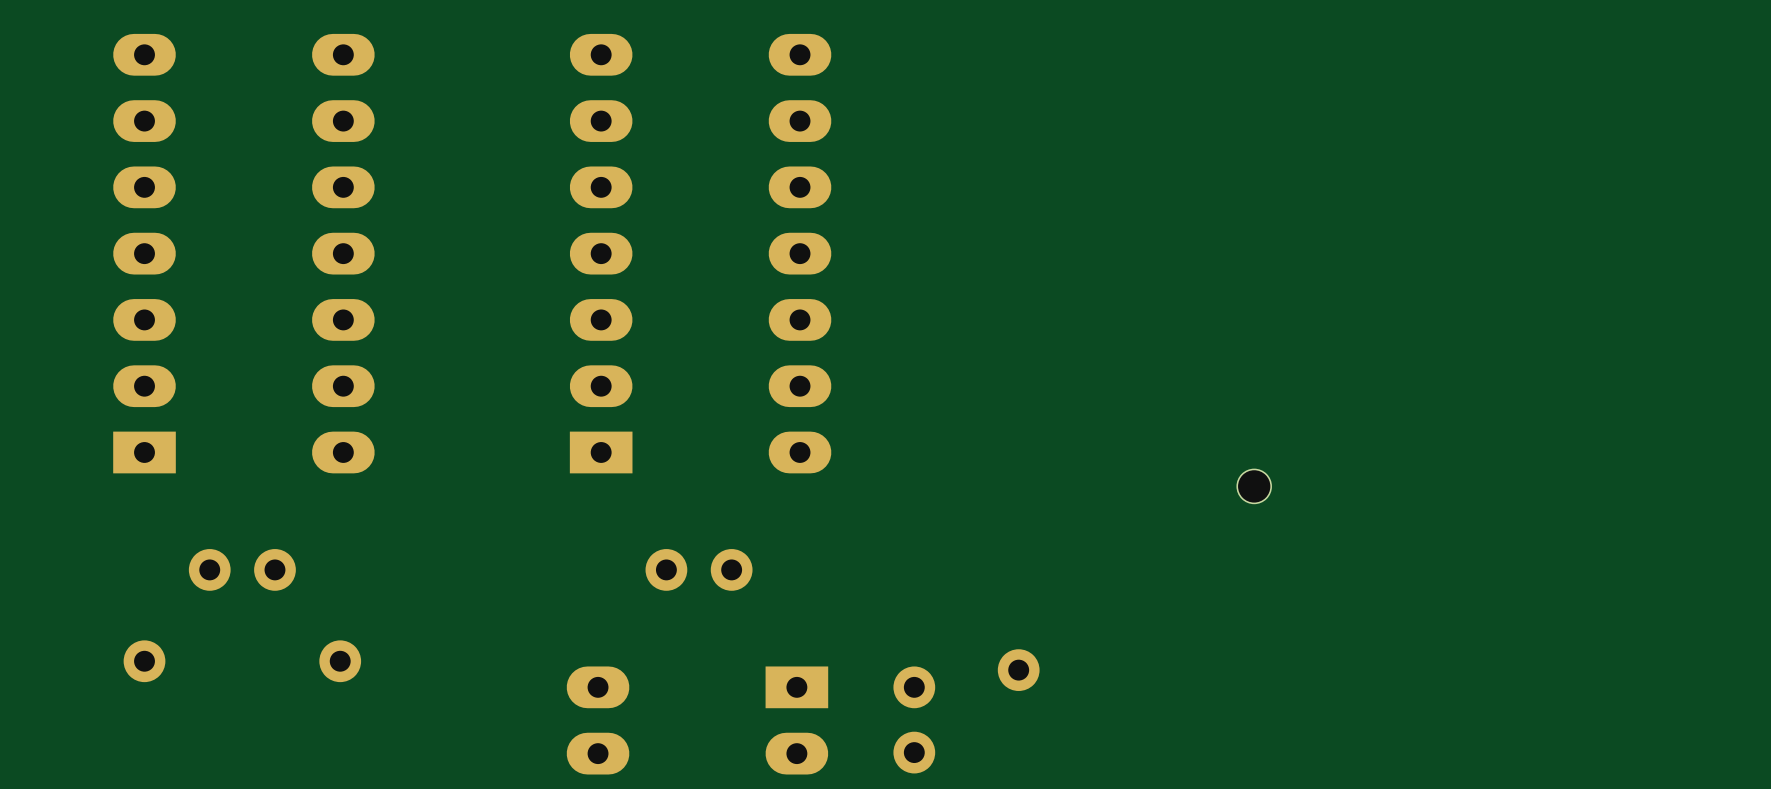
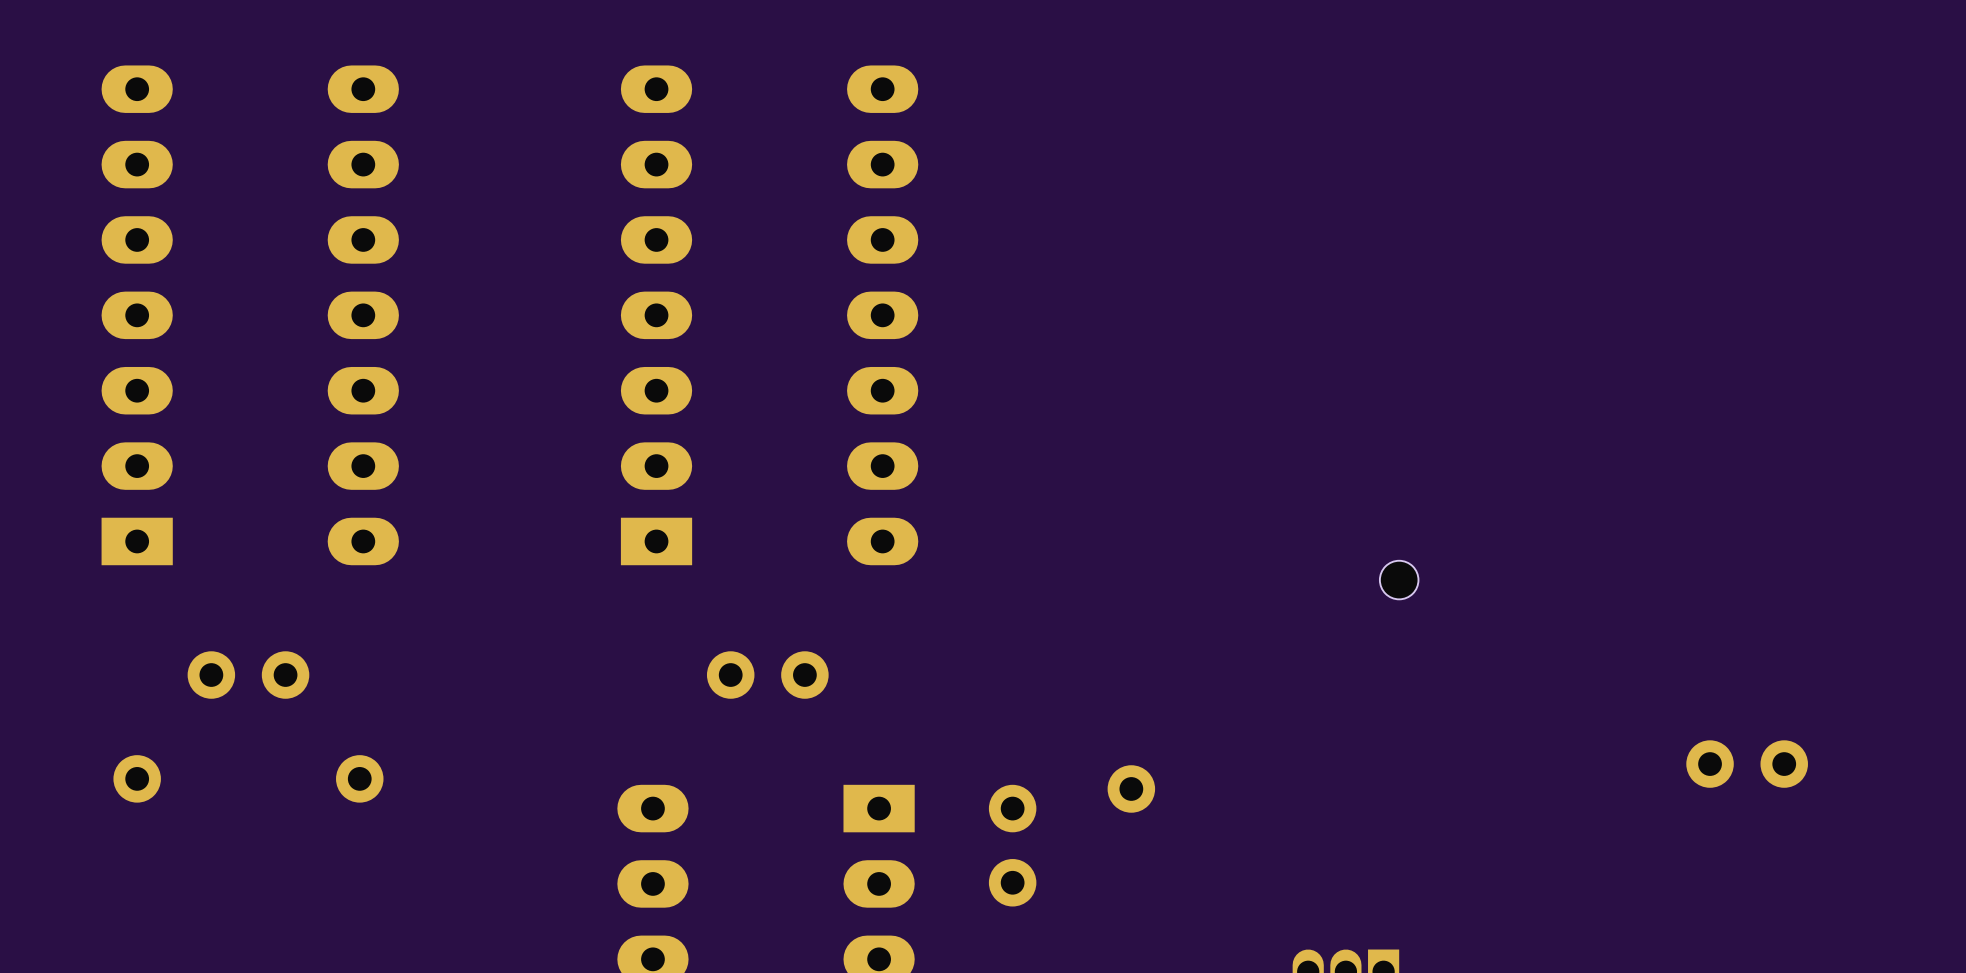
part: none -> (1747, 764)

